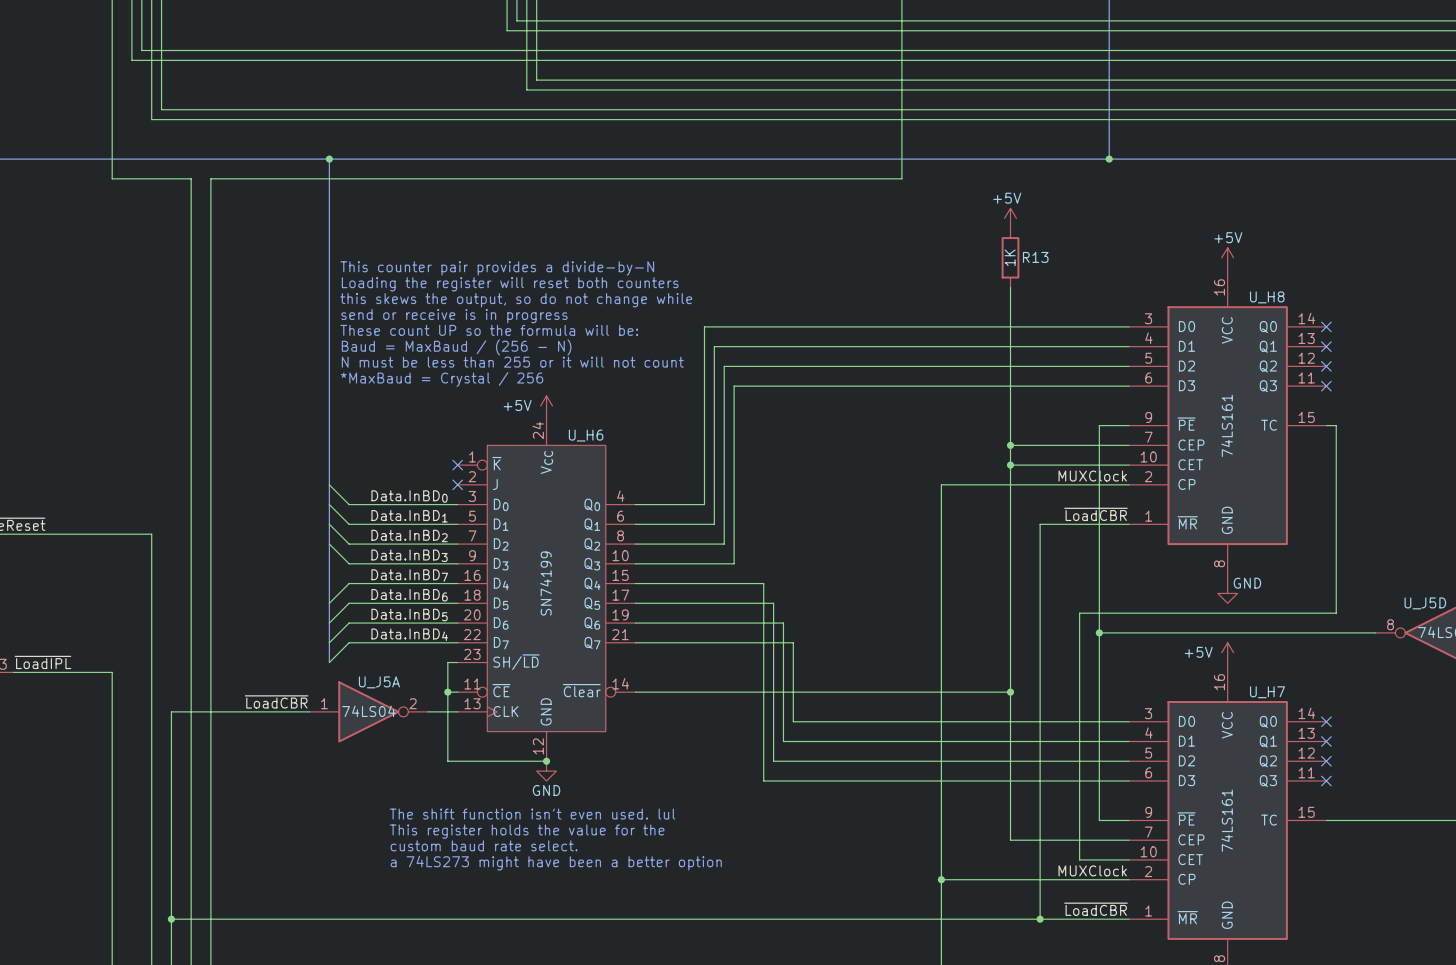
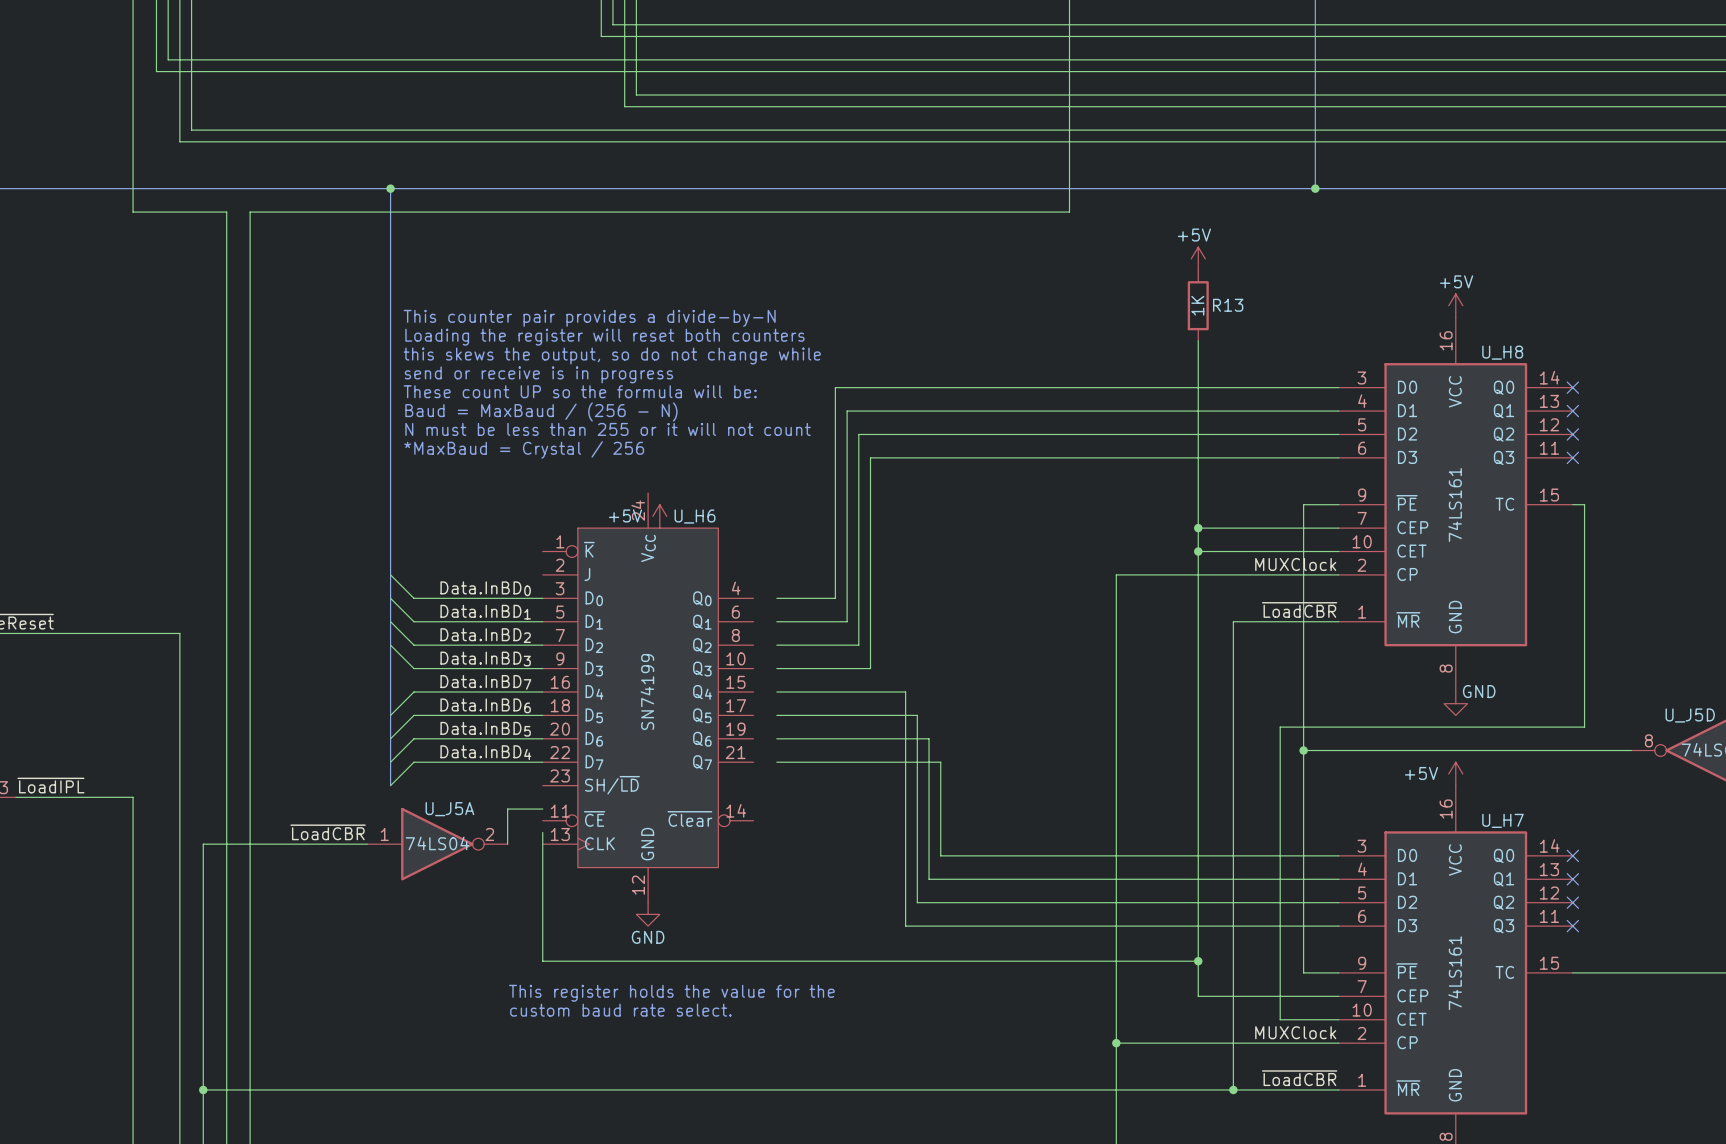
power symbol position: +5V (546, 405) -> +5V (659, 516)
no-connect mark: (457, 465) -> none
no-connect mark: (457, 484) -> none
wire: (635, 504) (655, 504) -> none
wire: (635, 524) (655, 524) -> none
wire: (635, 544) (655, 544) -> none
wire: (635, 563) (655, 563) -> none
wire: (635, 583) (655, 583) -> none
wire: (635, 603) (655, 603) -> none
wire: (635, 623) (655, 623) -> none
wire: (635, 642) (655, 642) -> none
wire: (457, 662) (447, 662) (447, 761) (546, 761) -> none
wire: (447, 692) (457, 692) -> none
junction: (447, 692) -> none
wire: (635, 692) (1010, 692) -> none
junction: (1010, 692) -> none
wire: none -> (542, 832) (542, 961) (1198, 961)
wire: (428, 711) (457, 711) -> (507, 844) (507, 809) (542, 809)
junction: (546, 761) -> none
junction: none -> (1198, 961)
text: The shift function isn't even used. lul (532, 814) -> none
text position: This register holds the value for the (527, 831) -> This register holds the value for the (671, 993)
text position: custom baud rate select. (484, 845) -> custom baud rate select. (620, 1010)
text: a 74LS273 might have been a better option (556, 863) -> none

